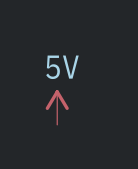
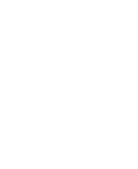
power symbol: 5V (57, 107) -> none

